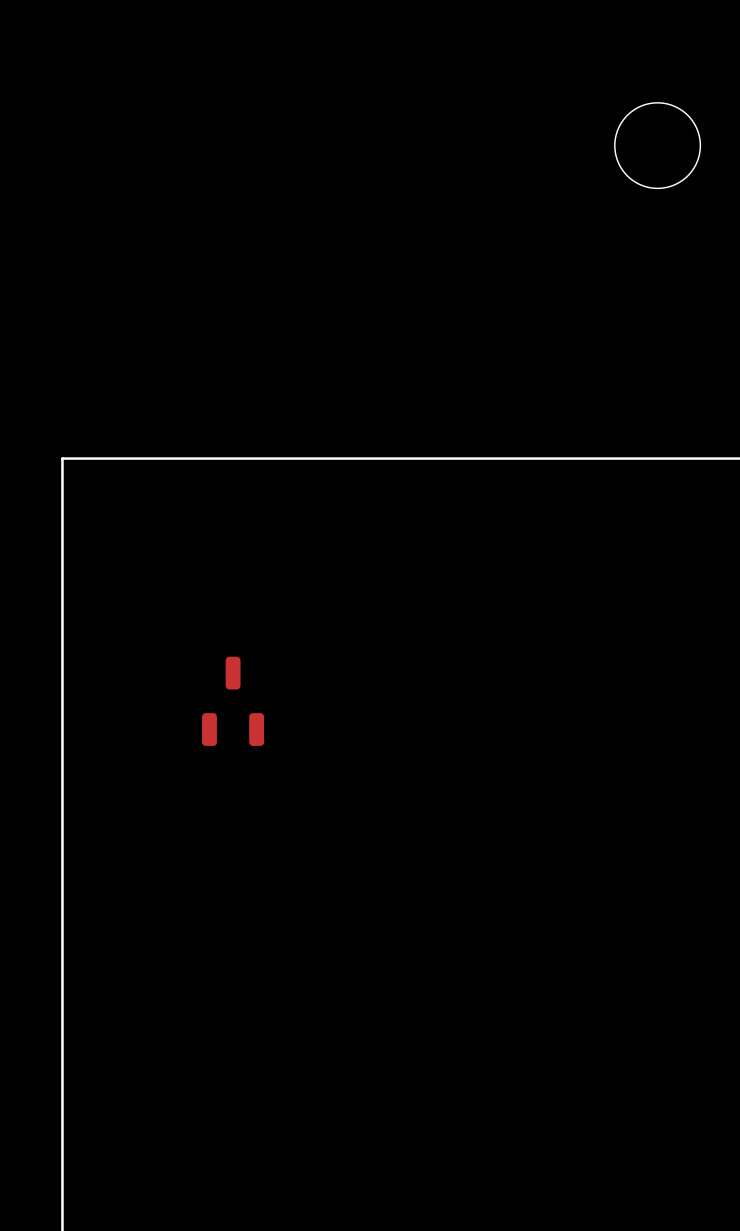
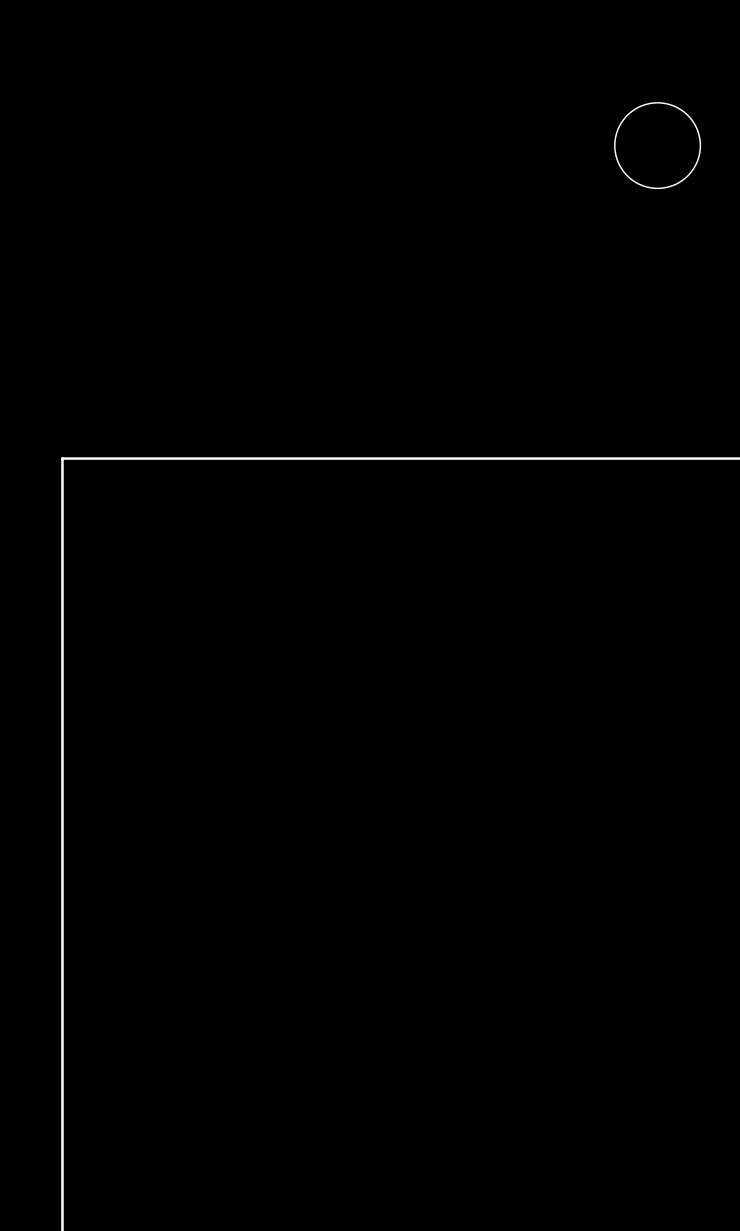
part: (233, 701) -> none

